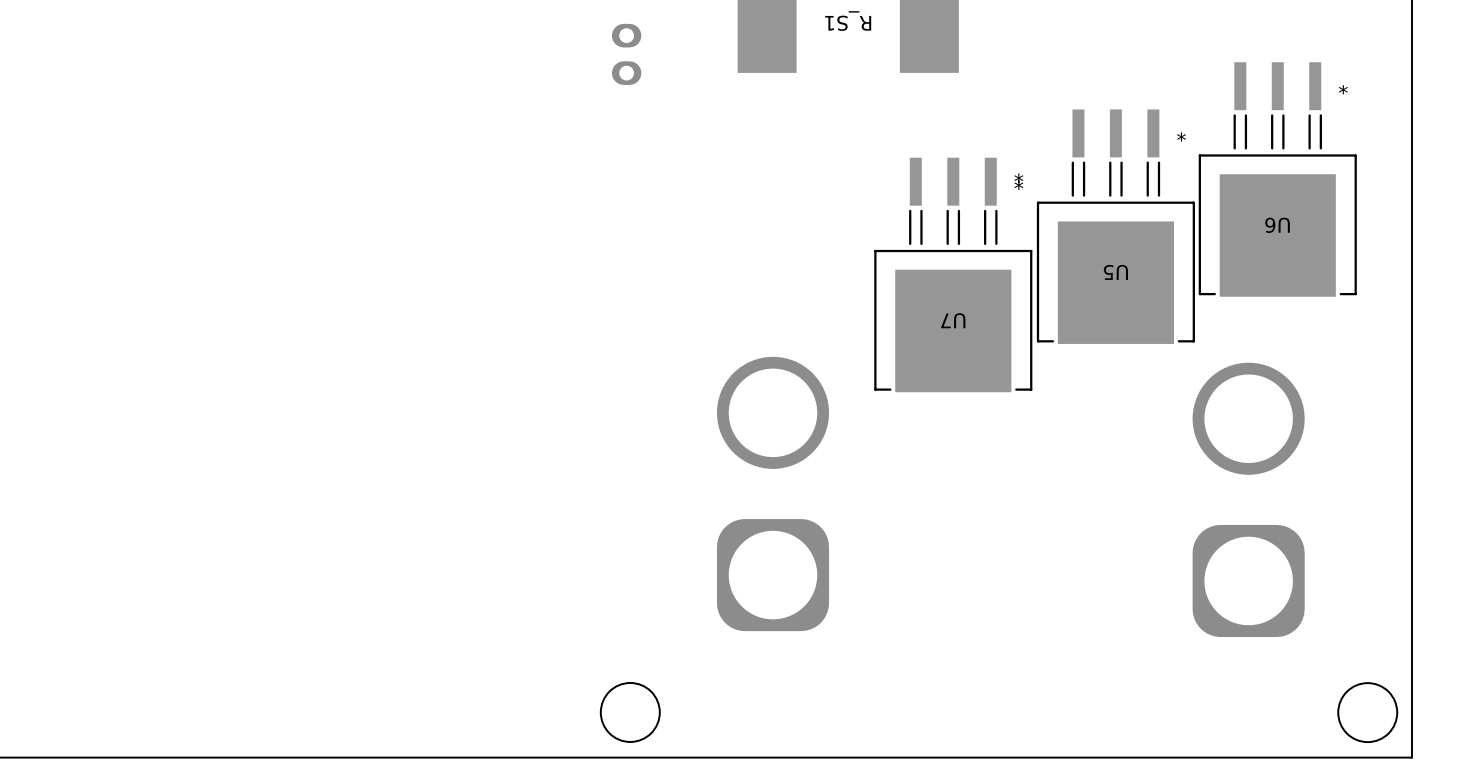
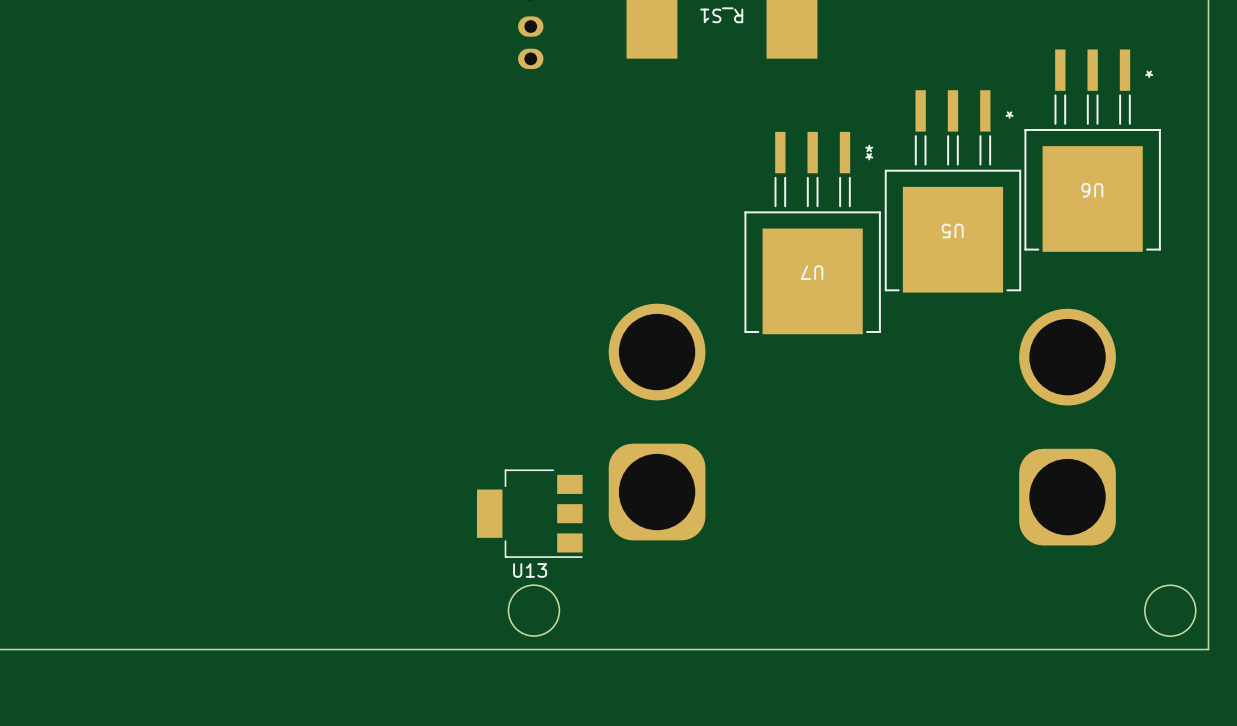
U13: none -> (529, 513)

